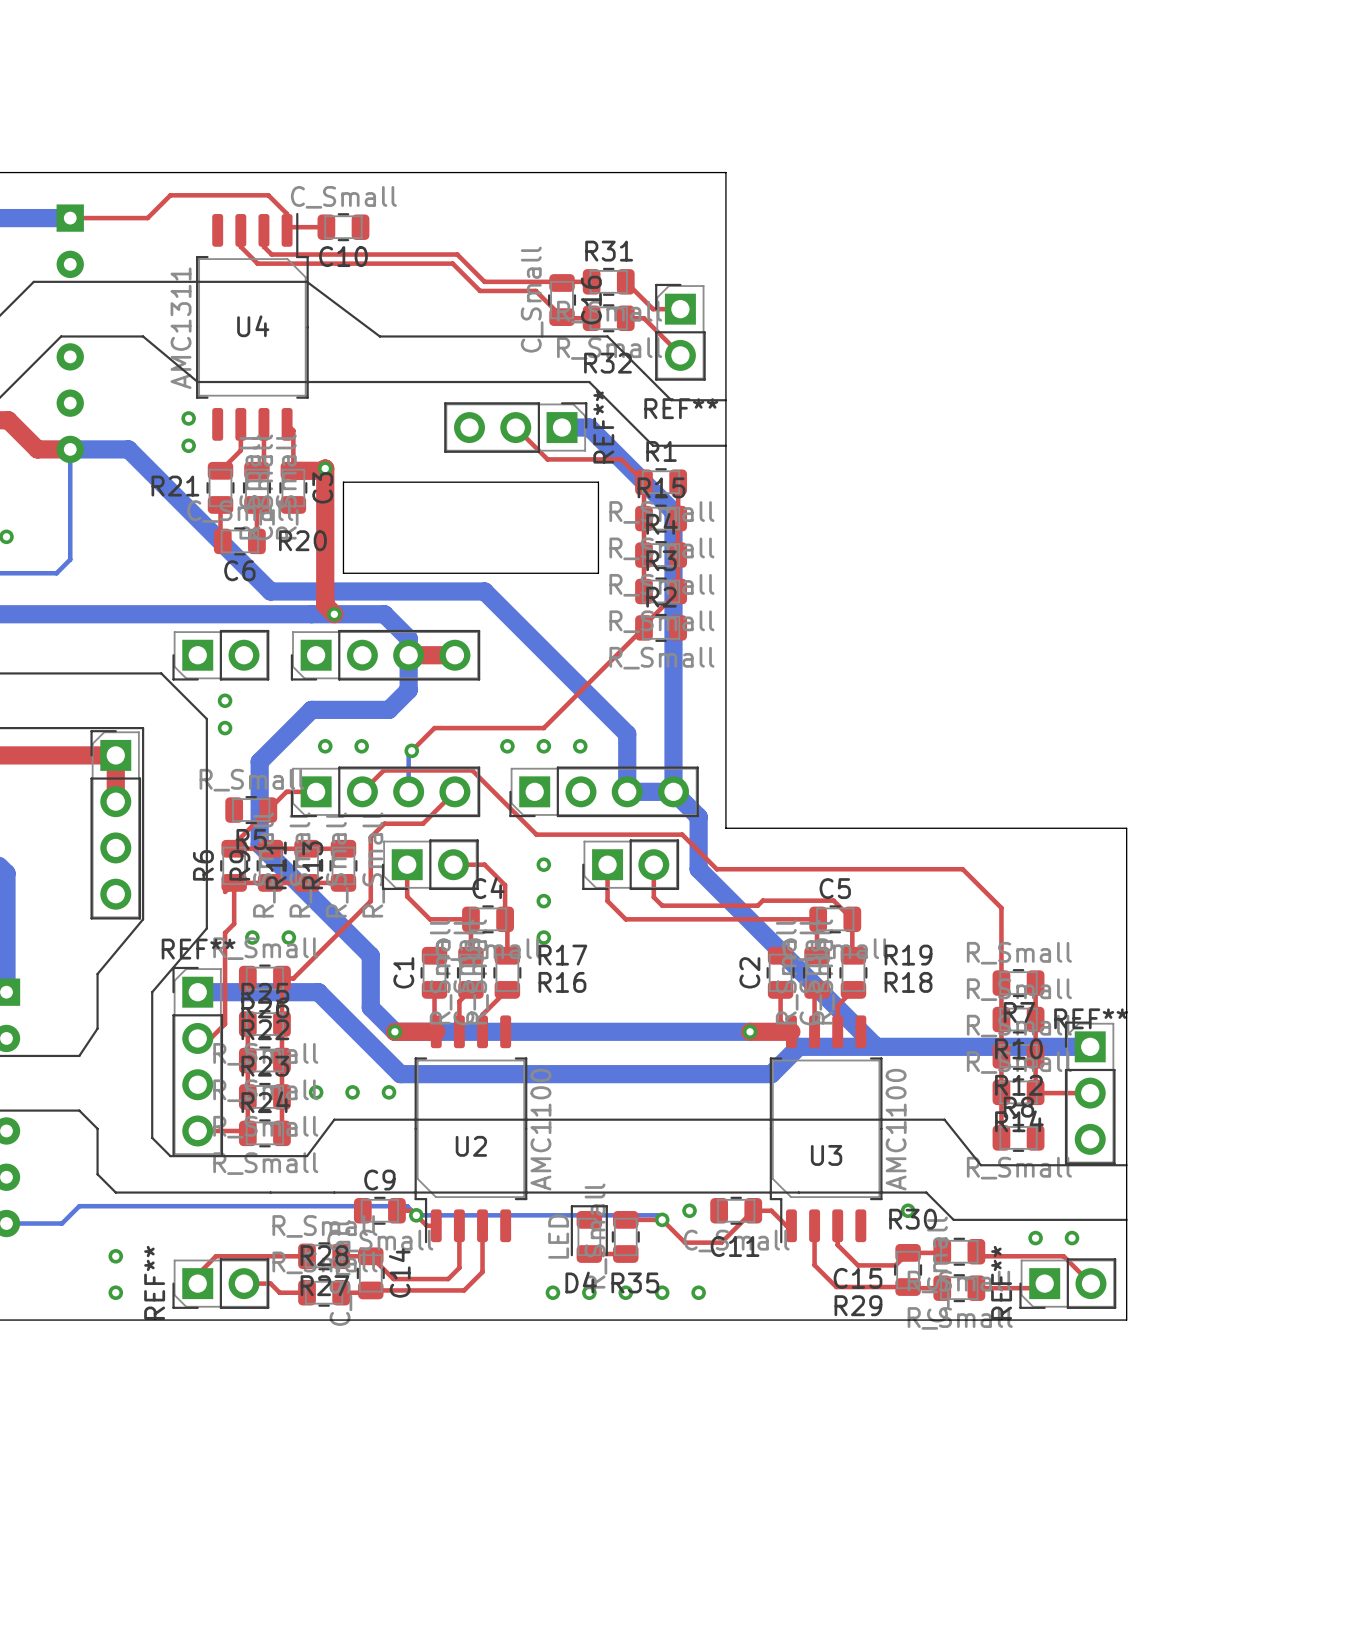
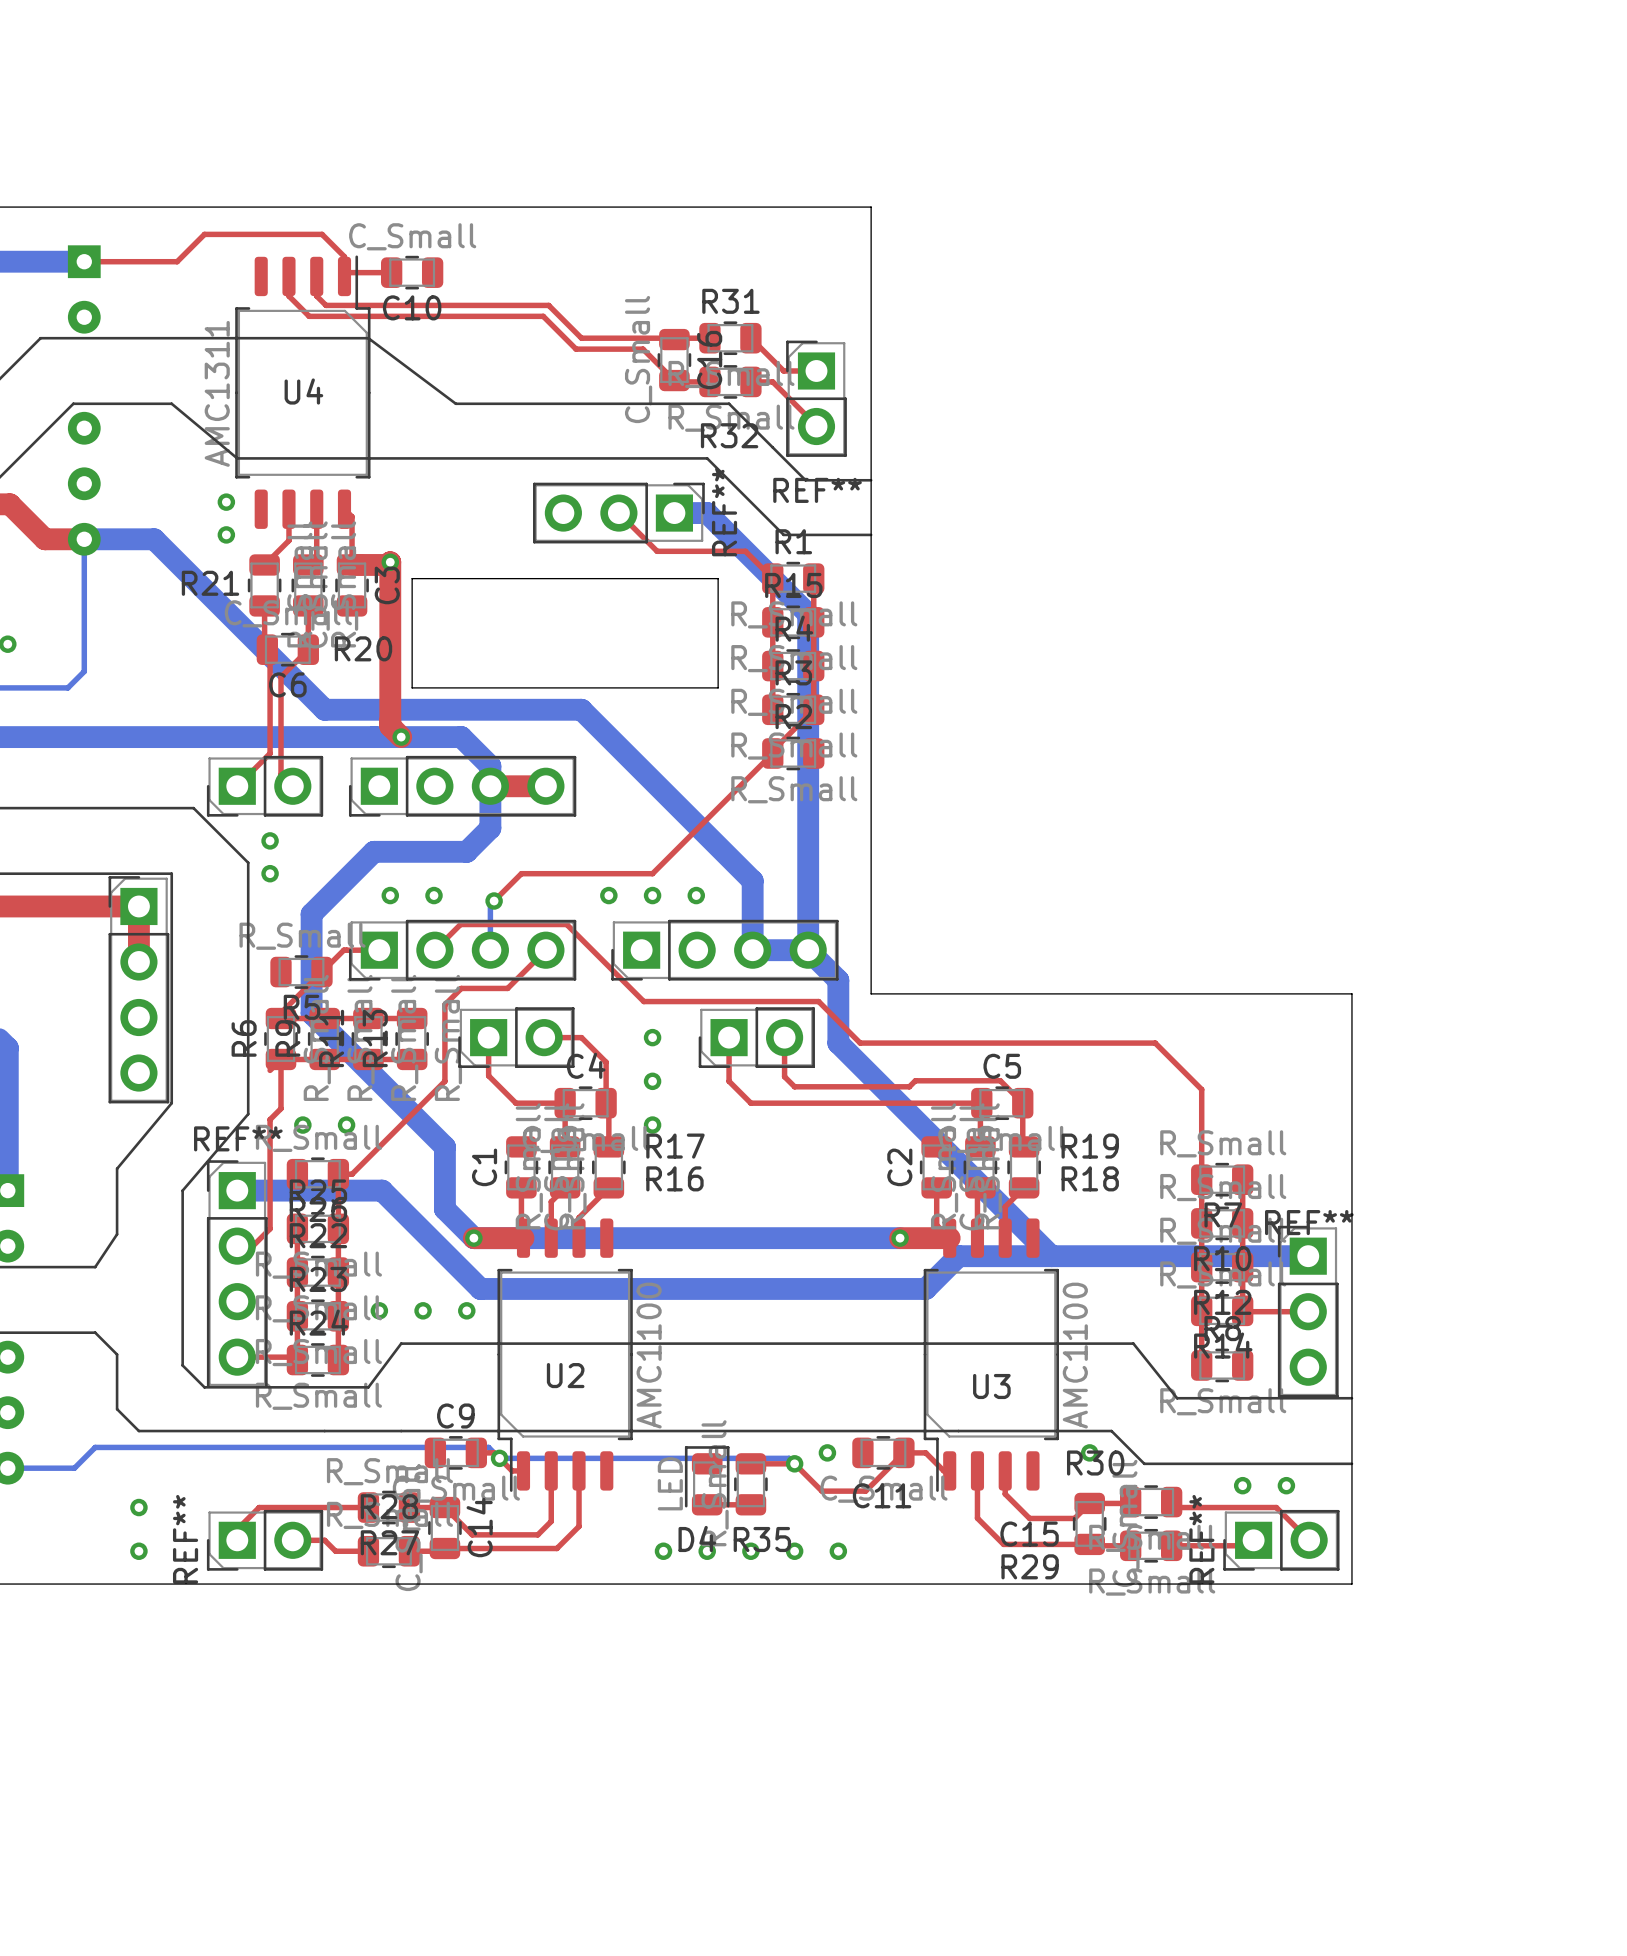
top track: none -> (267, 649) (270, 652) (270, 753) (237, 786)
top track: none -> (308, 649) (281, 676) (281, 774) (292, 786)

